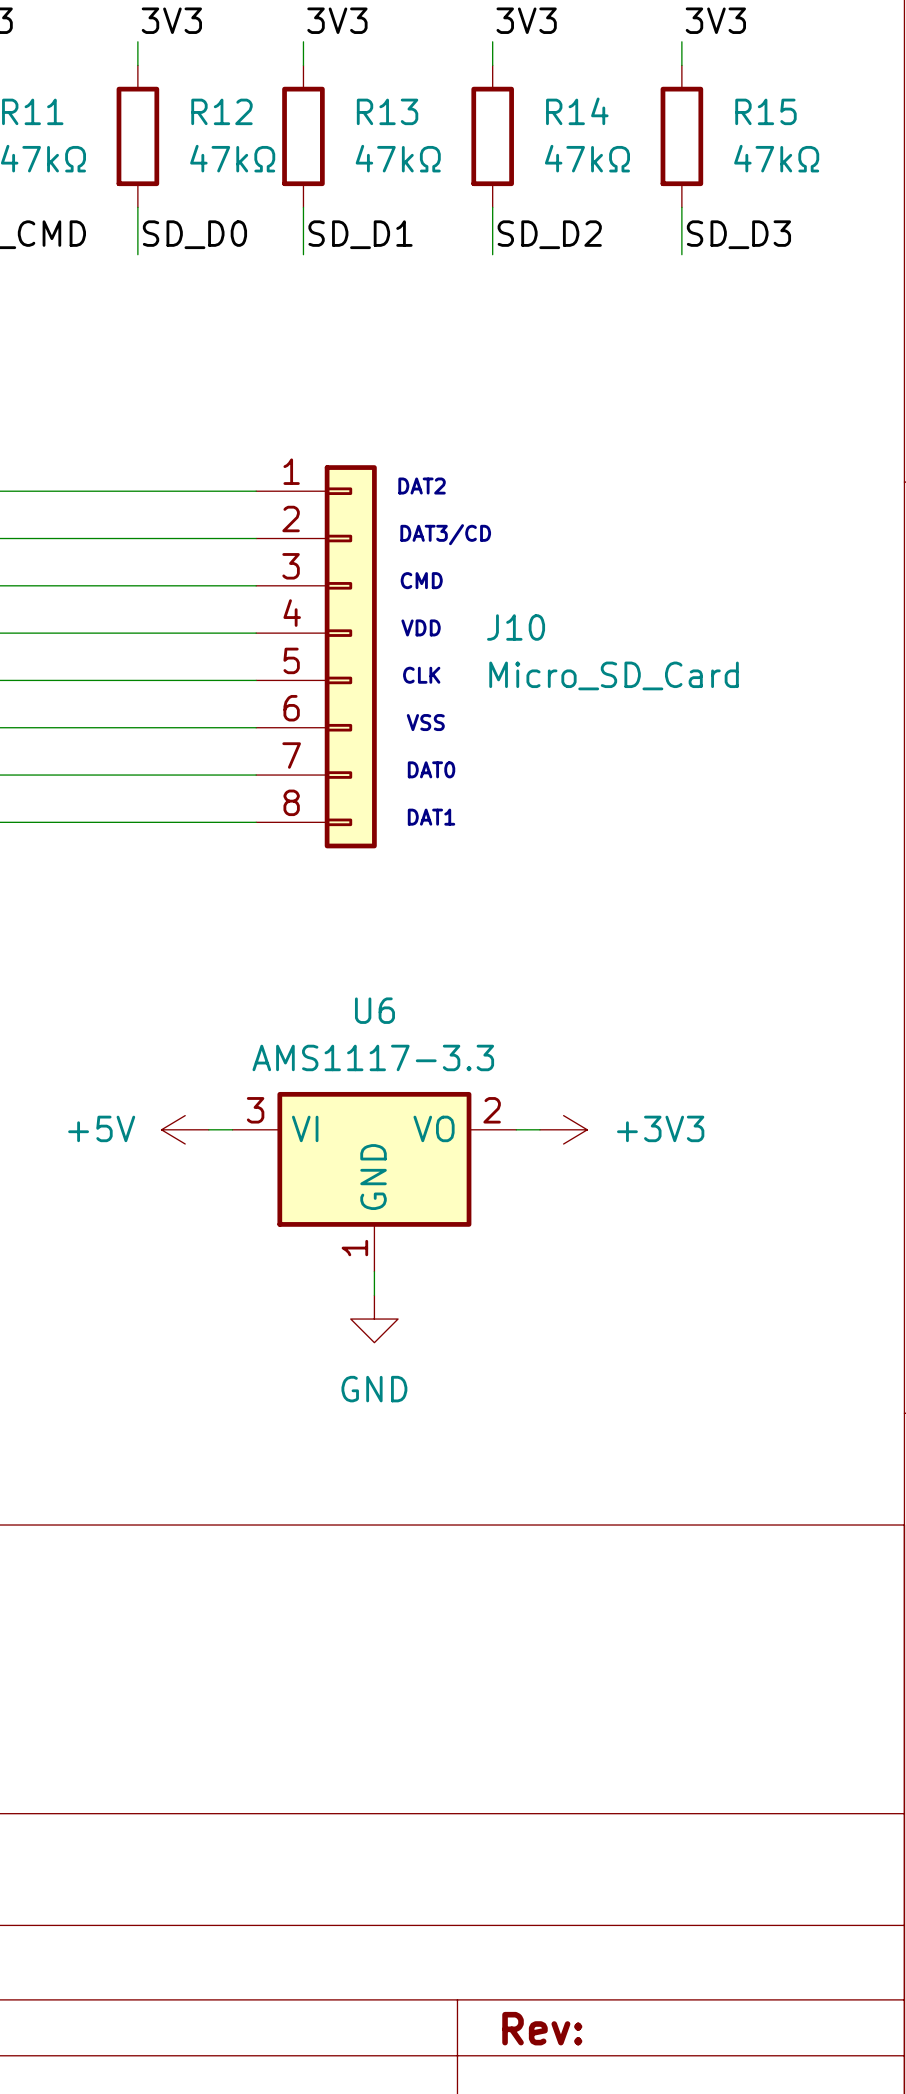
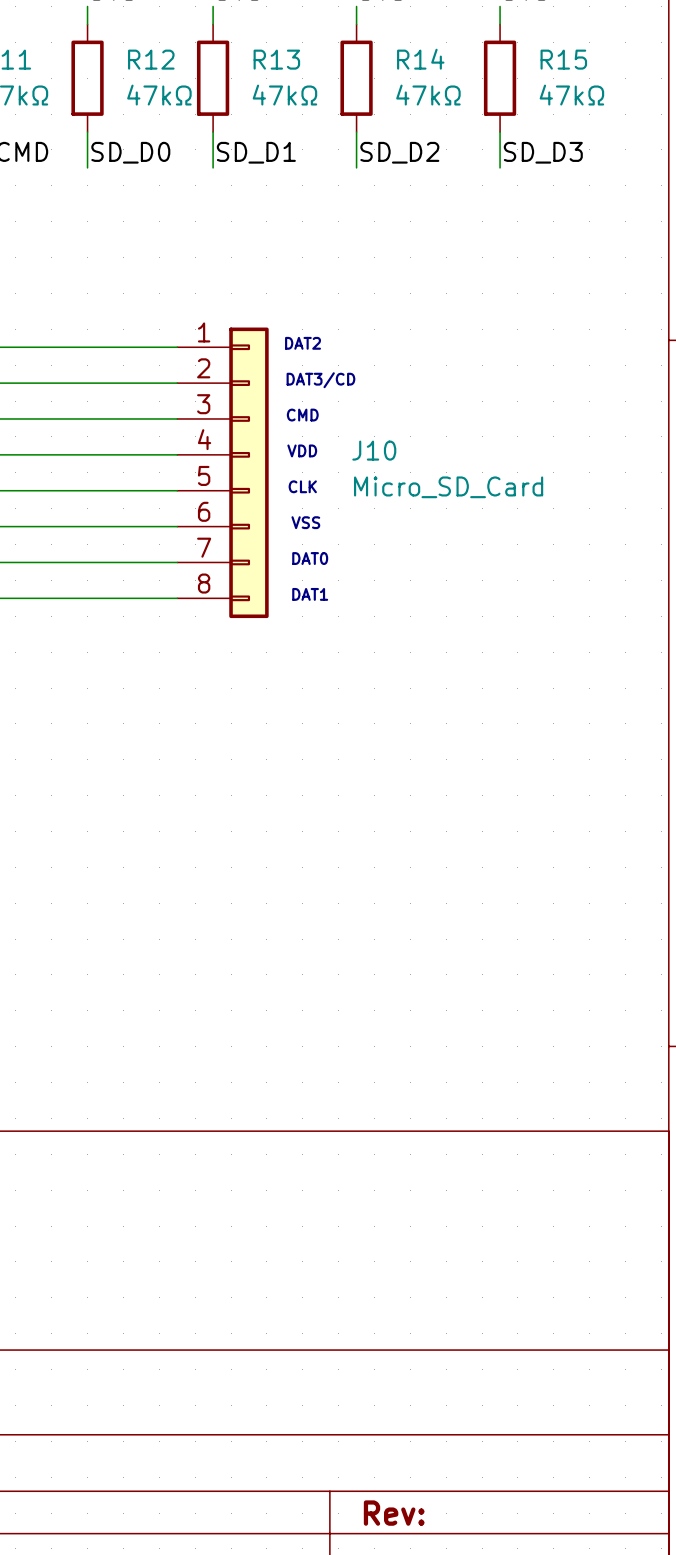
power symbol: +5V (185, 1129) -> none
wire: (208, 1129) (232, 1129) -> none
wire: (516, 1129) (539, 1129) -> none
power symbol: +3V3 (563, 1129) -> none
U6: AMS1117-3.3 (374, 1181) -> none
wire: (374, 1271) (374, 1295) -> none
power symbol: GND (374, 1319) -> none

